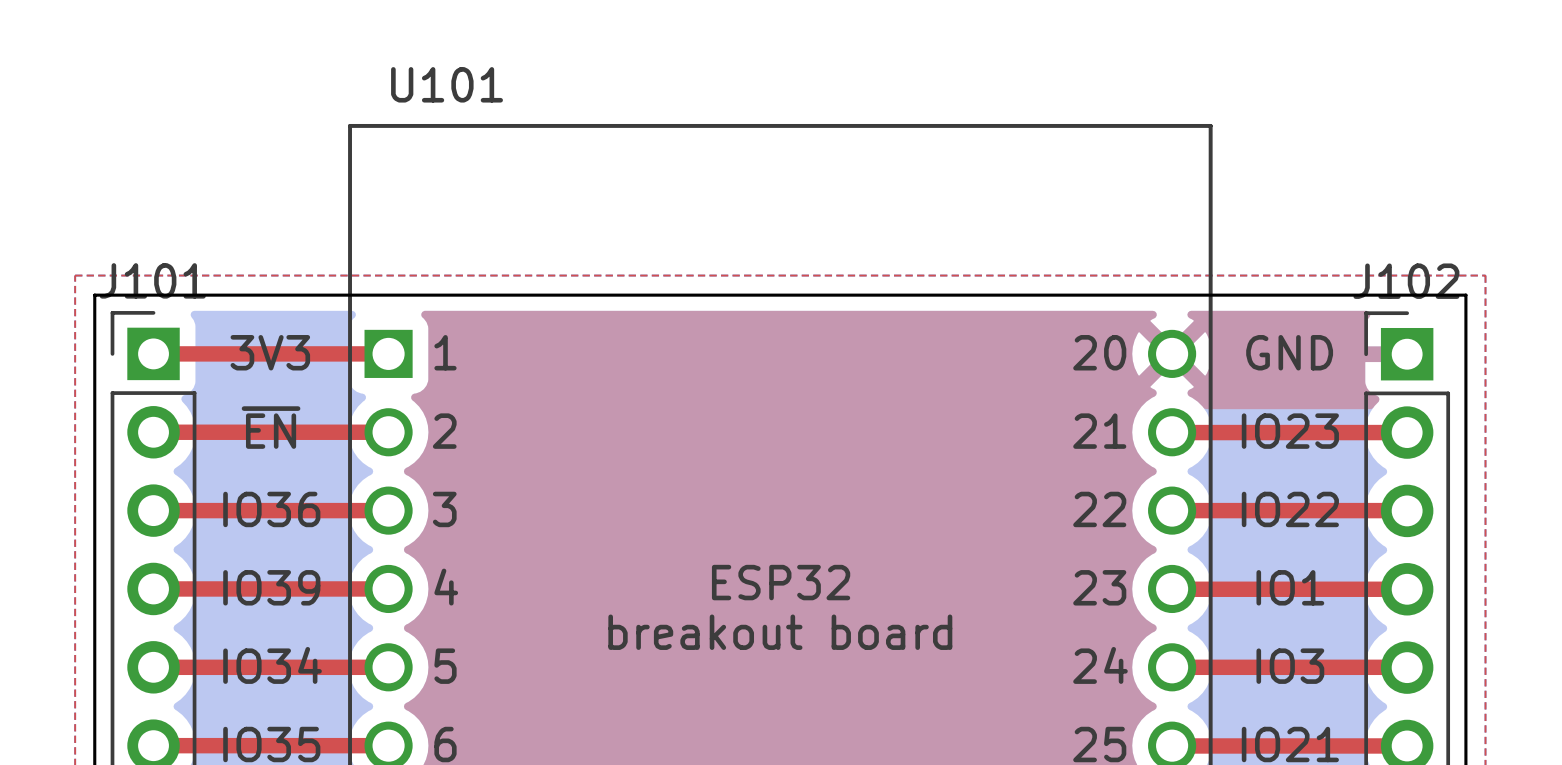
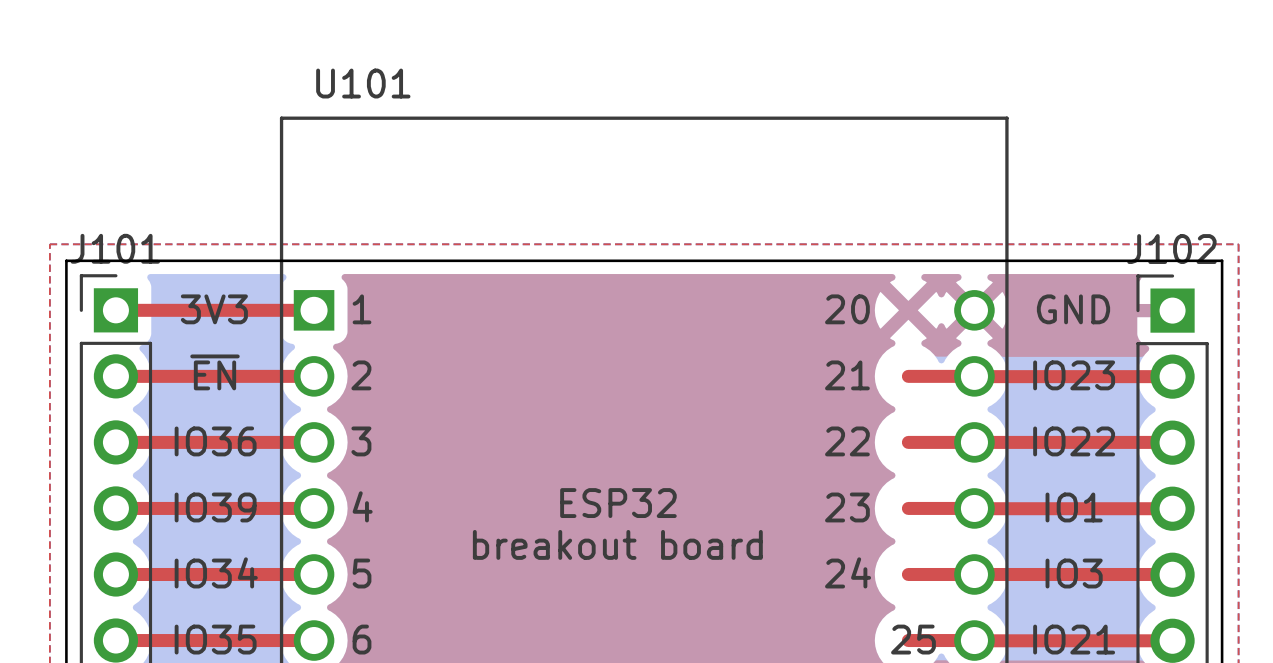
text position: 20 (1099, 352) -> 20 (847, 309)
text position: 21 (1099, 431) -> 21 (847, 375)
top track: none -> (908, 376) (974, 376)
text position: 22 (1099, 509) -> 22 (847, 441)
top track: none -> (908, 442) (974, 442)
text position: ESP32 (781, 582) -> ESP32 (618, 503)
text position: 23 (1099, 587) -> 23 (847, 507)
top track: none -> (908, 508) (974, 508)
text position: breakout board (780, 632) -> breakout board (617, 544)
text position: 24 (1100, 665) -> 24 (848, 572)
top track: none -> (908, 574) (974, 574)
top track: none -> (908, 640) (974, 640)

